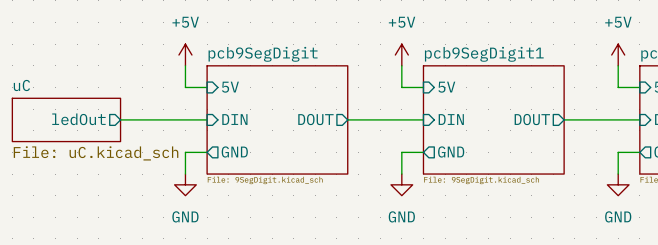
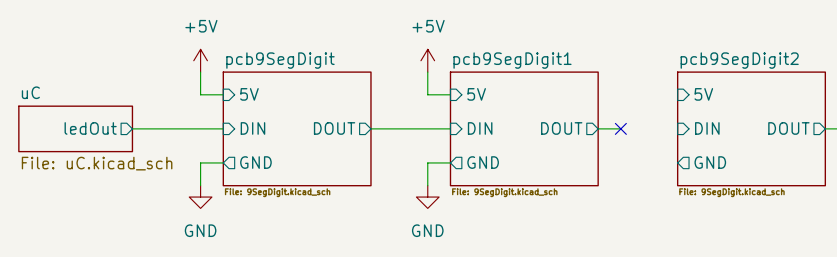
power symbol: +5V (618, 55) -> none
wire: (618, 65) (618, 87) (639, 87) -> none
wire: (585, 119) (639, 119) -> none
no-connect mark: none -> (620, 128)
wire: (639, 152) (618, 152) (618, 174) -> none
power symbol: GND (618, 184) -> none

